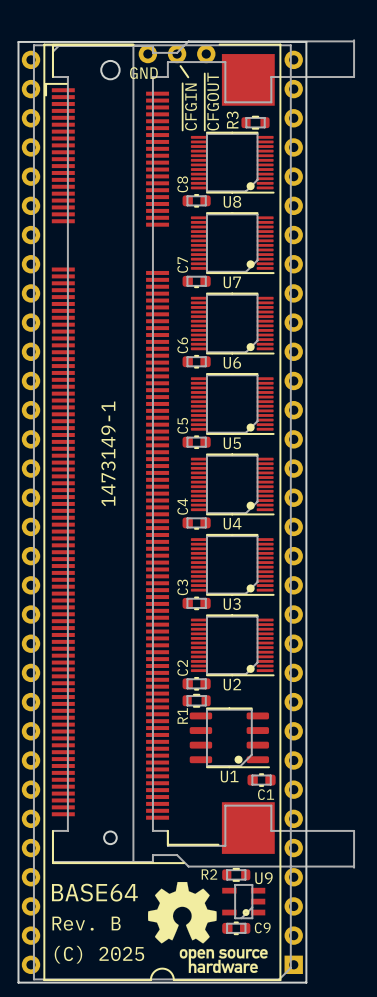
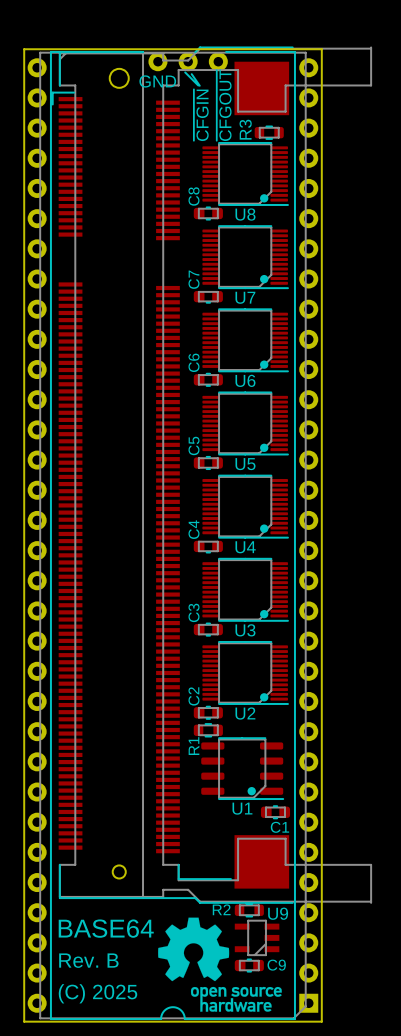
part footprint: [45, 39, 355, 869] -> [51, 46, 372, 904]
part footprint: [21, 43, 303, 981] -> [27, 51, 319, 1020]
line: none -> (185, 72) (198, 85)
text: 1473149-1 (108, 453) -> none
U9 footprint: [222, 884, 266, 919] -> [234, 920, 280, 956]

